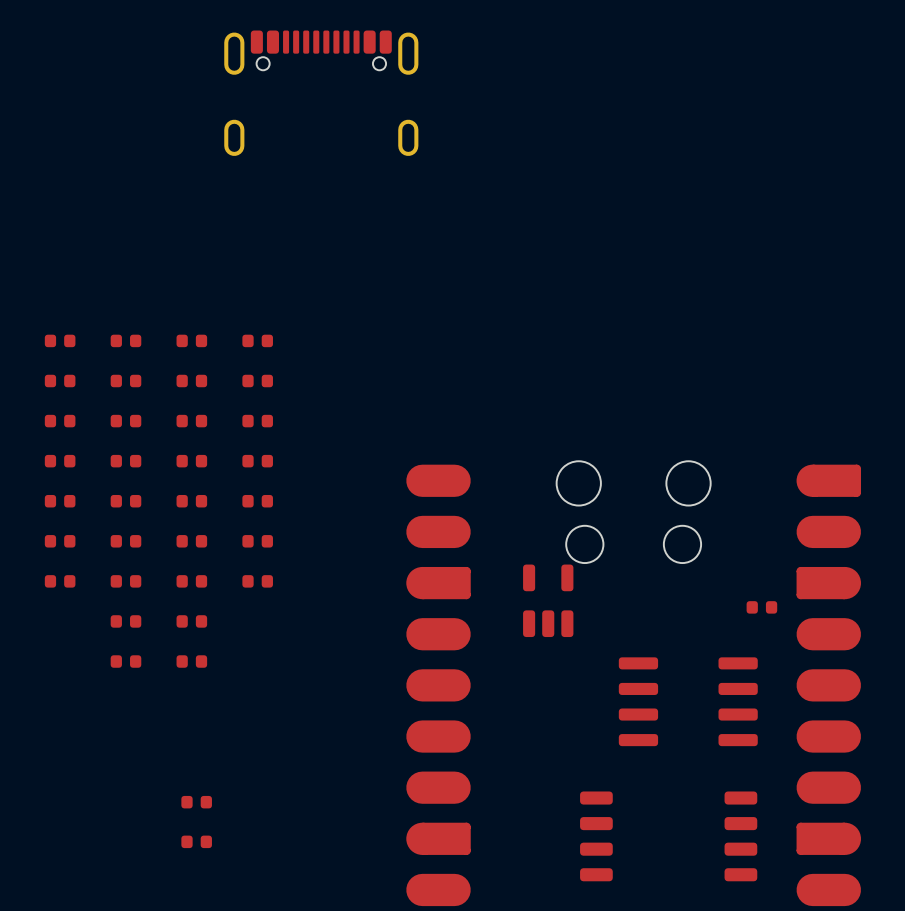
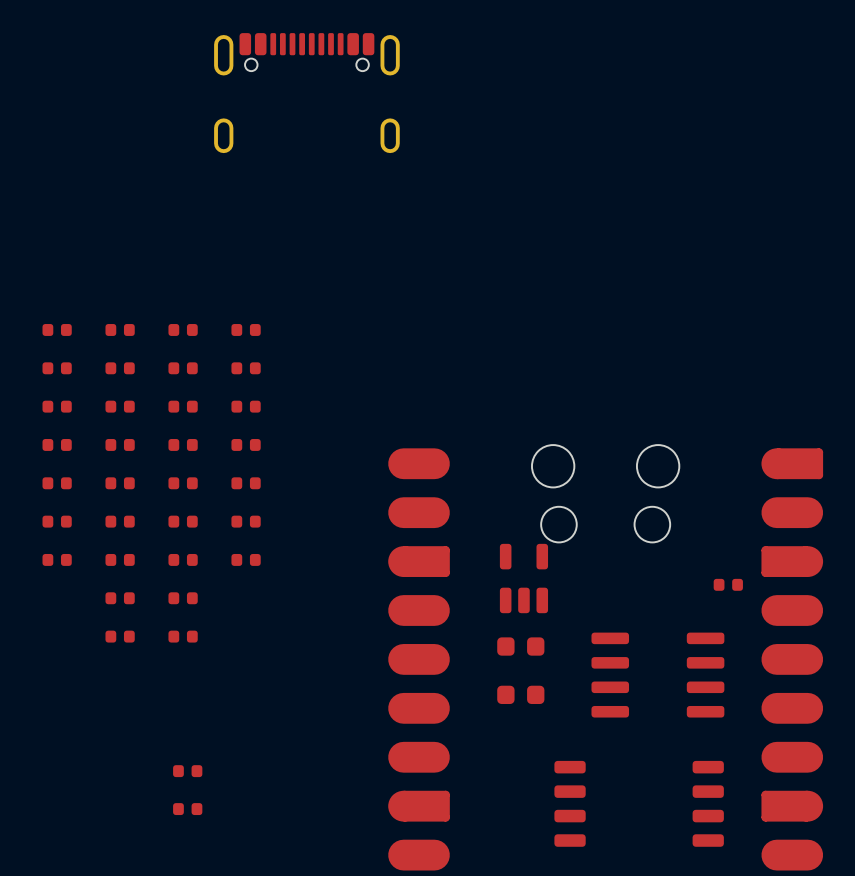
part: none -> (520, 646)
part: none -> (520, 694)

